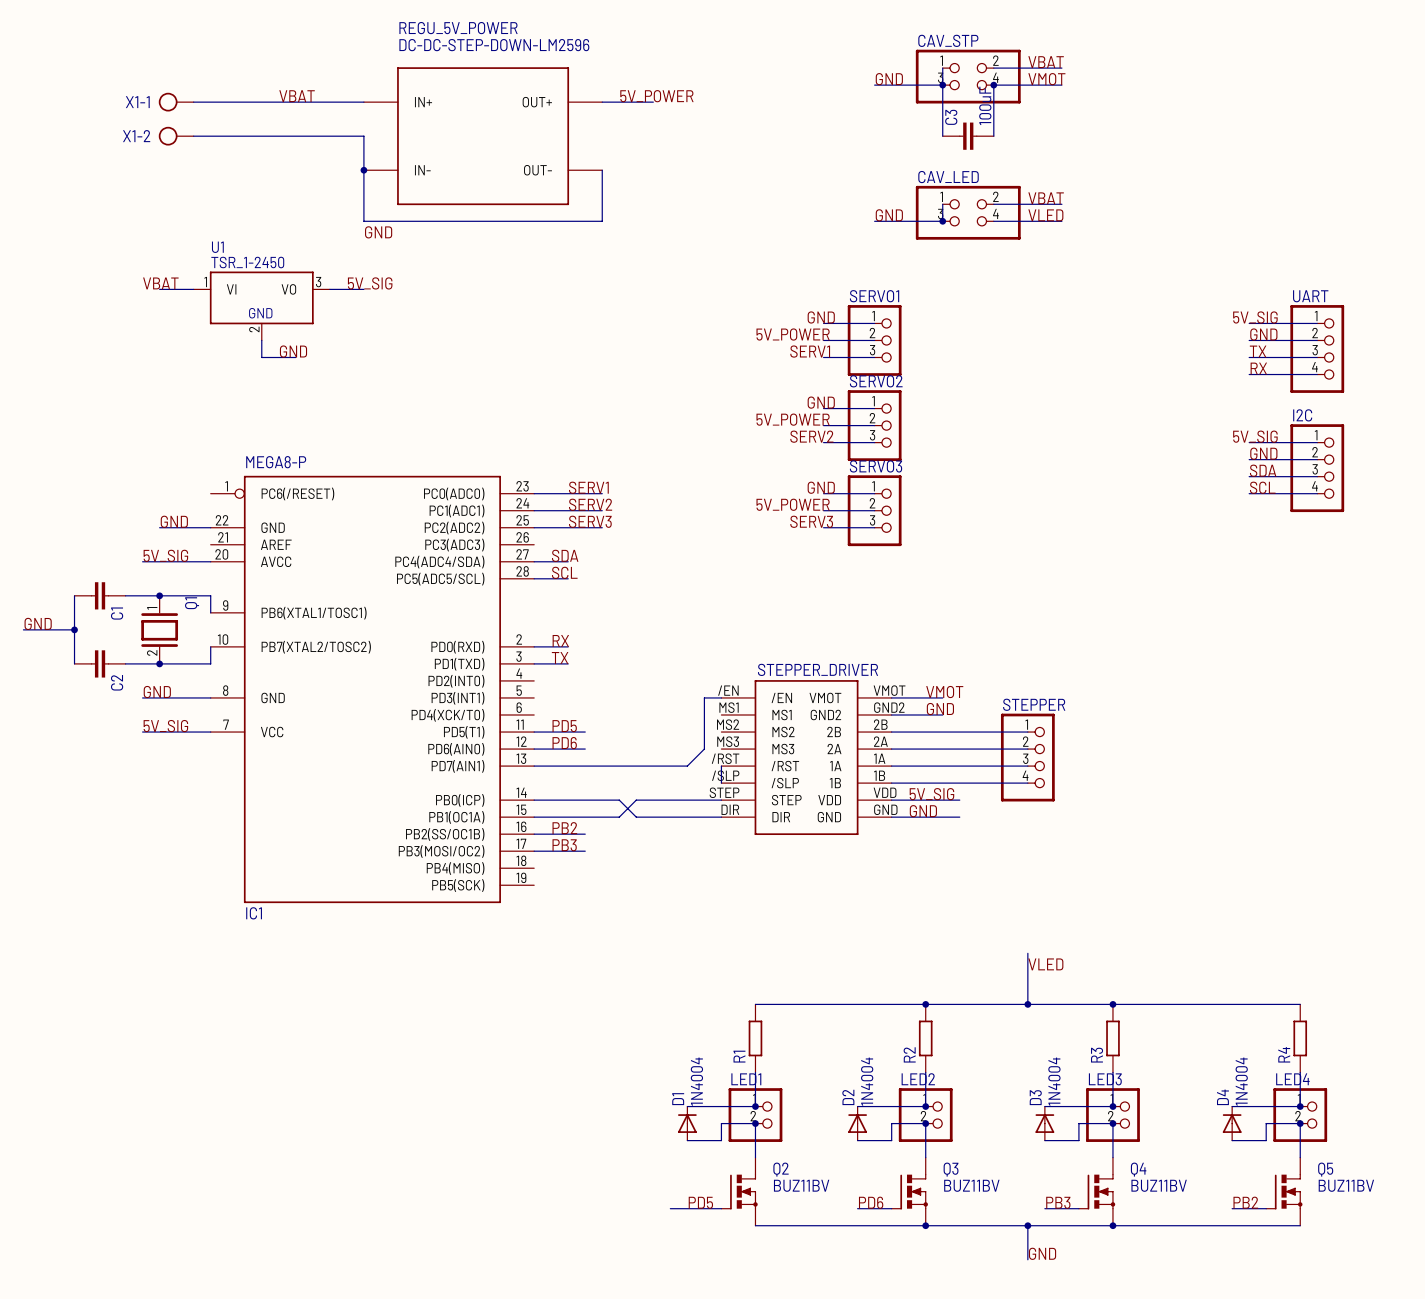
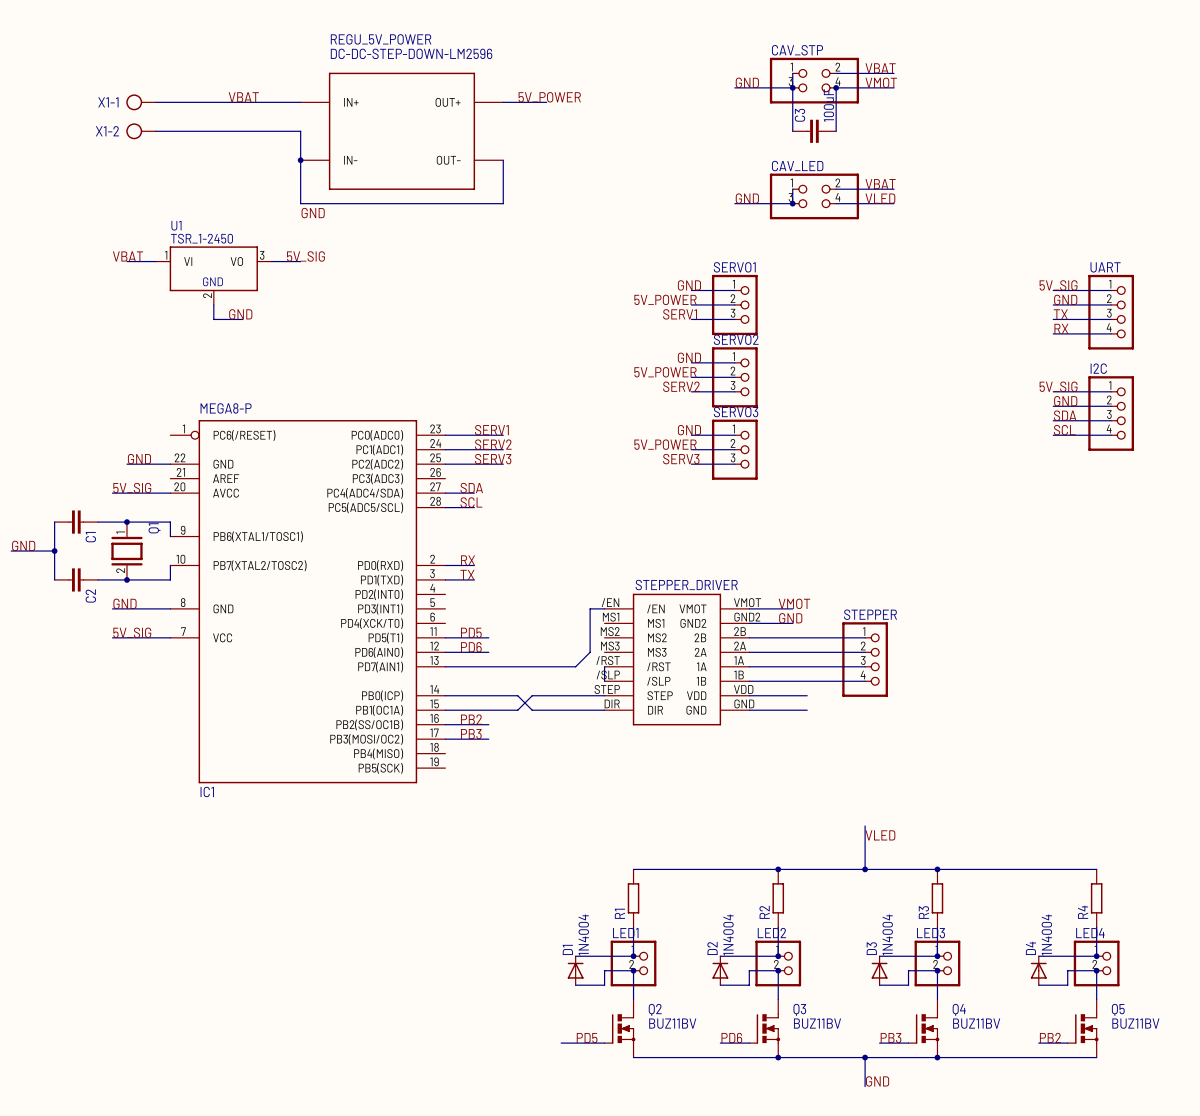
label: 5V_SIG (931, 794) -> none
label: GND (923, 811) -> none

